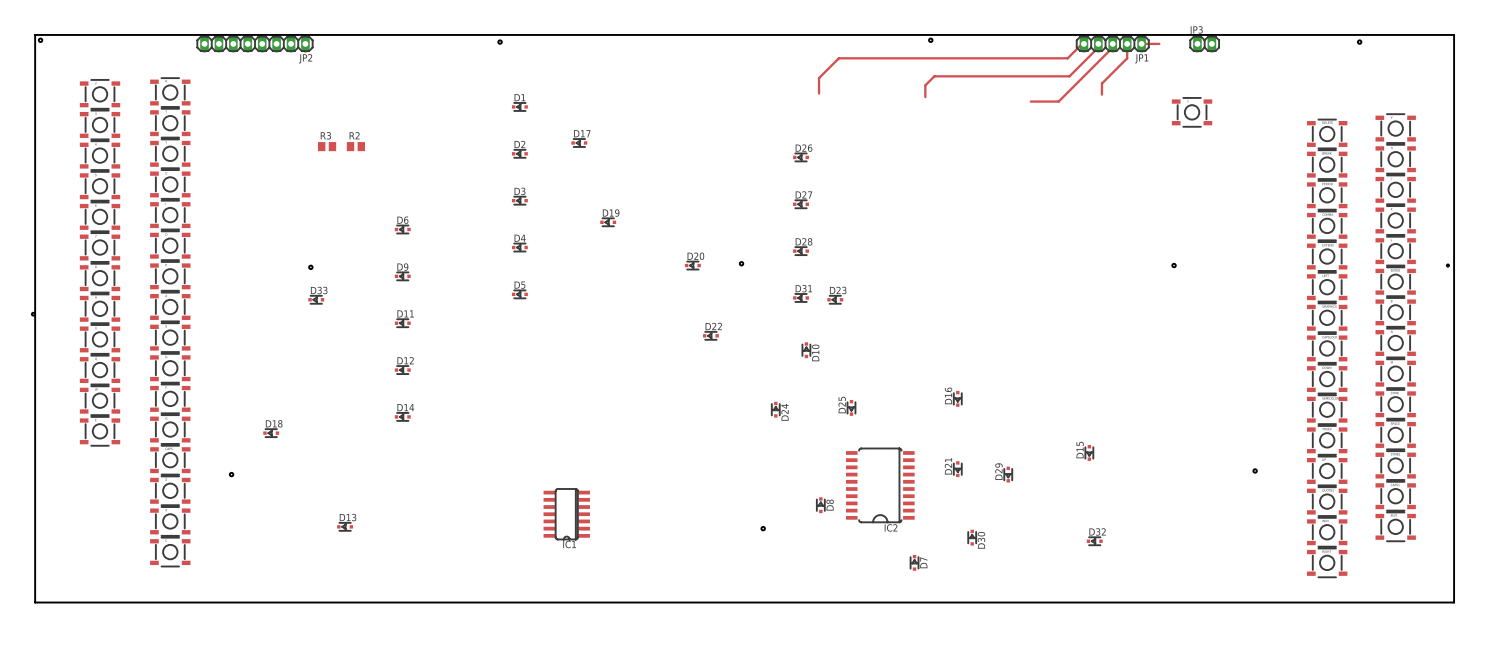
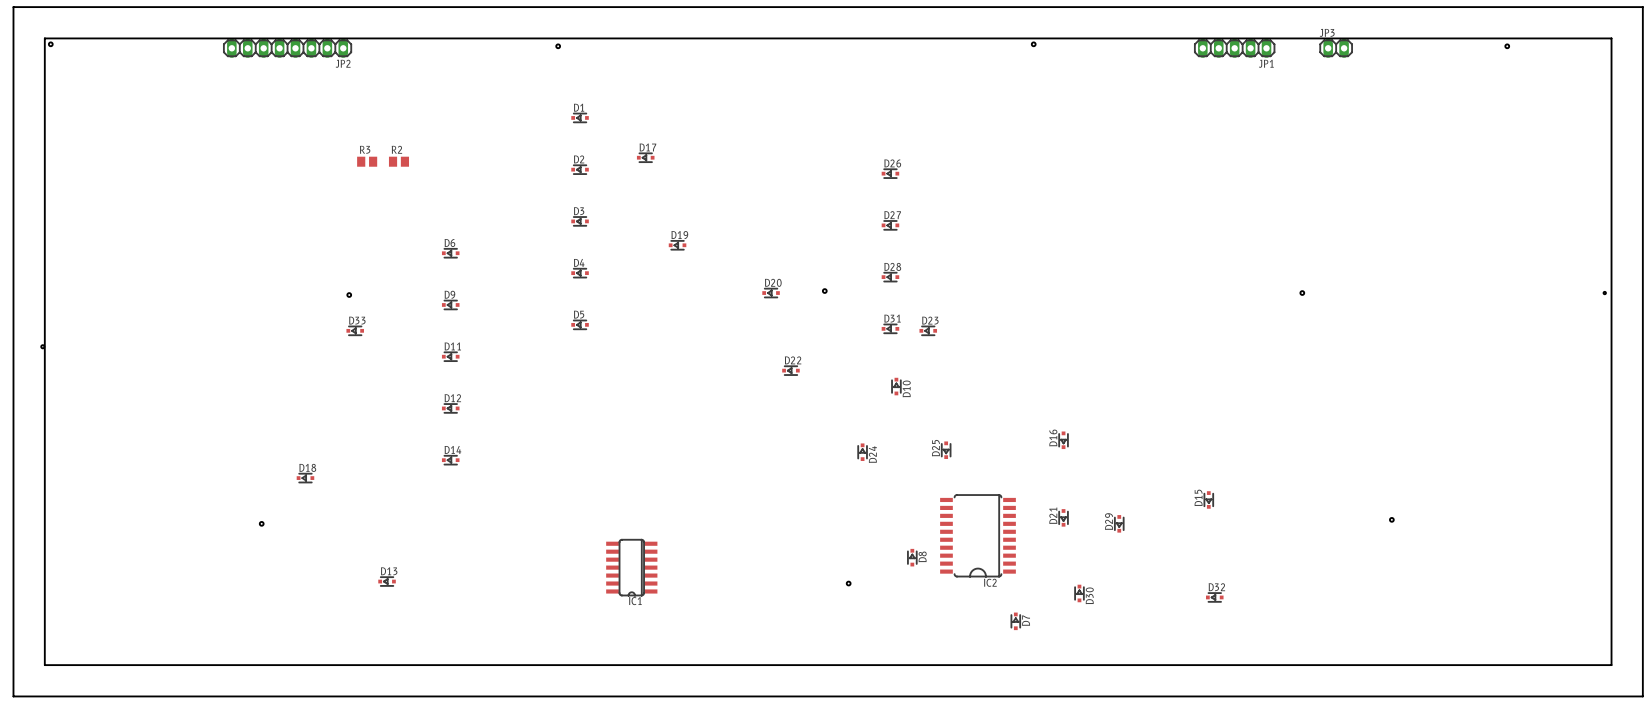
board edge: none -> (13, 7) (1642, 7) (1642, 696) (13, 696) (13, 7)
track: (1083, 43) (1067, 58) (838, 58) (819, 78) (819, 93) -> none
track: (1098, 43) (1098, 47) (1069, 76) (934, 76) (925, 85) (925, 97) -> none
track: (1112, 43) (1112, 47) (1058, 101) (1030, 101) -> none
track: (1127, 43) (1127, 58) (1101, 83) (1101, 94) -> none
track: (1141, 43) (1159, 43) -> none
part: (170, 92) -> none
part: (100, 94) -> none
part: (1192, 112) -> none
part: (170, 123) -> none
part: (100, 124) -> none
part: (1395, 128) -> none
part: (1327, 133) -> none
part: (170, 153) -> none
part: (100, 155) -> none
part: (1395, 159) -> none
part: (1327, 164) -> none
part: (170, 184) -> none
part: (100, 186) -> none
part: (1395, 189) -> none
part: (1327, 195) -> none
part: (170, 215) -> none
part: (100, 216) -> none
part: (1395, 220) -> none
part: (1327, 225) -> none
part: (170, 245) -> none
part: (100, 247) -> none
part: (1395, 251) -> none
part: (1327, 256) -> none
part: (170, 276) -> none
part: (100, 278) -> none
part: (1395, 281) -> none
part: (1327, 287) -> none
part: (170, 306) -> none
part: (100, 308) -> none
part: (1395, 312) -> none
part: (1327, 317) -> none
part: (170, 337) -> none
part: (100, 339) -> none
part: (1395, 343) -> none
part: (1327, 348) -> none
part: (170, 368) -> none
part: (100, 370) -> none
part: (1395, 373) -> none
part: (1327, 379) -> none
part: (170, 398) -> none
part: (100, 400) -> none
part: (1395, 404) -> none
part: (1327, 409) -> none
part: (170, 429) -> none
part: (100, 431) -> none
part: (1395, 434) -> none
part: (1327, 440) -> none
part: (170, 460) -> none
part: (1395, 465) -> none
part: (1327, 470) -> none
part: (170, 490) -> none
part: (1395, 496) -> none
part: (1327, 501) -> none
part: (170, 521) -> none
part: (1395, 526) -> none
part: (1327, 532) -> none
part: (170, 552) -> none
part: (1327, 562) -> none

